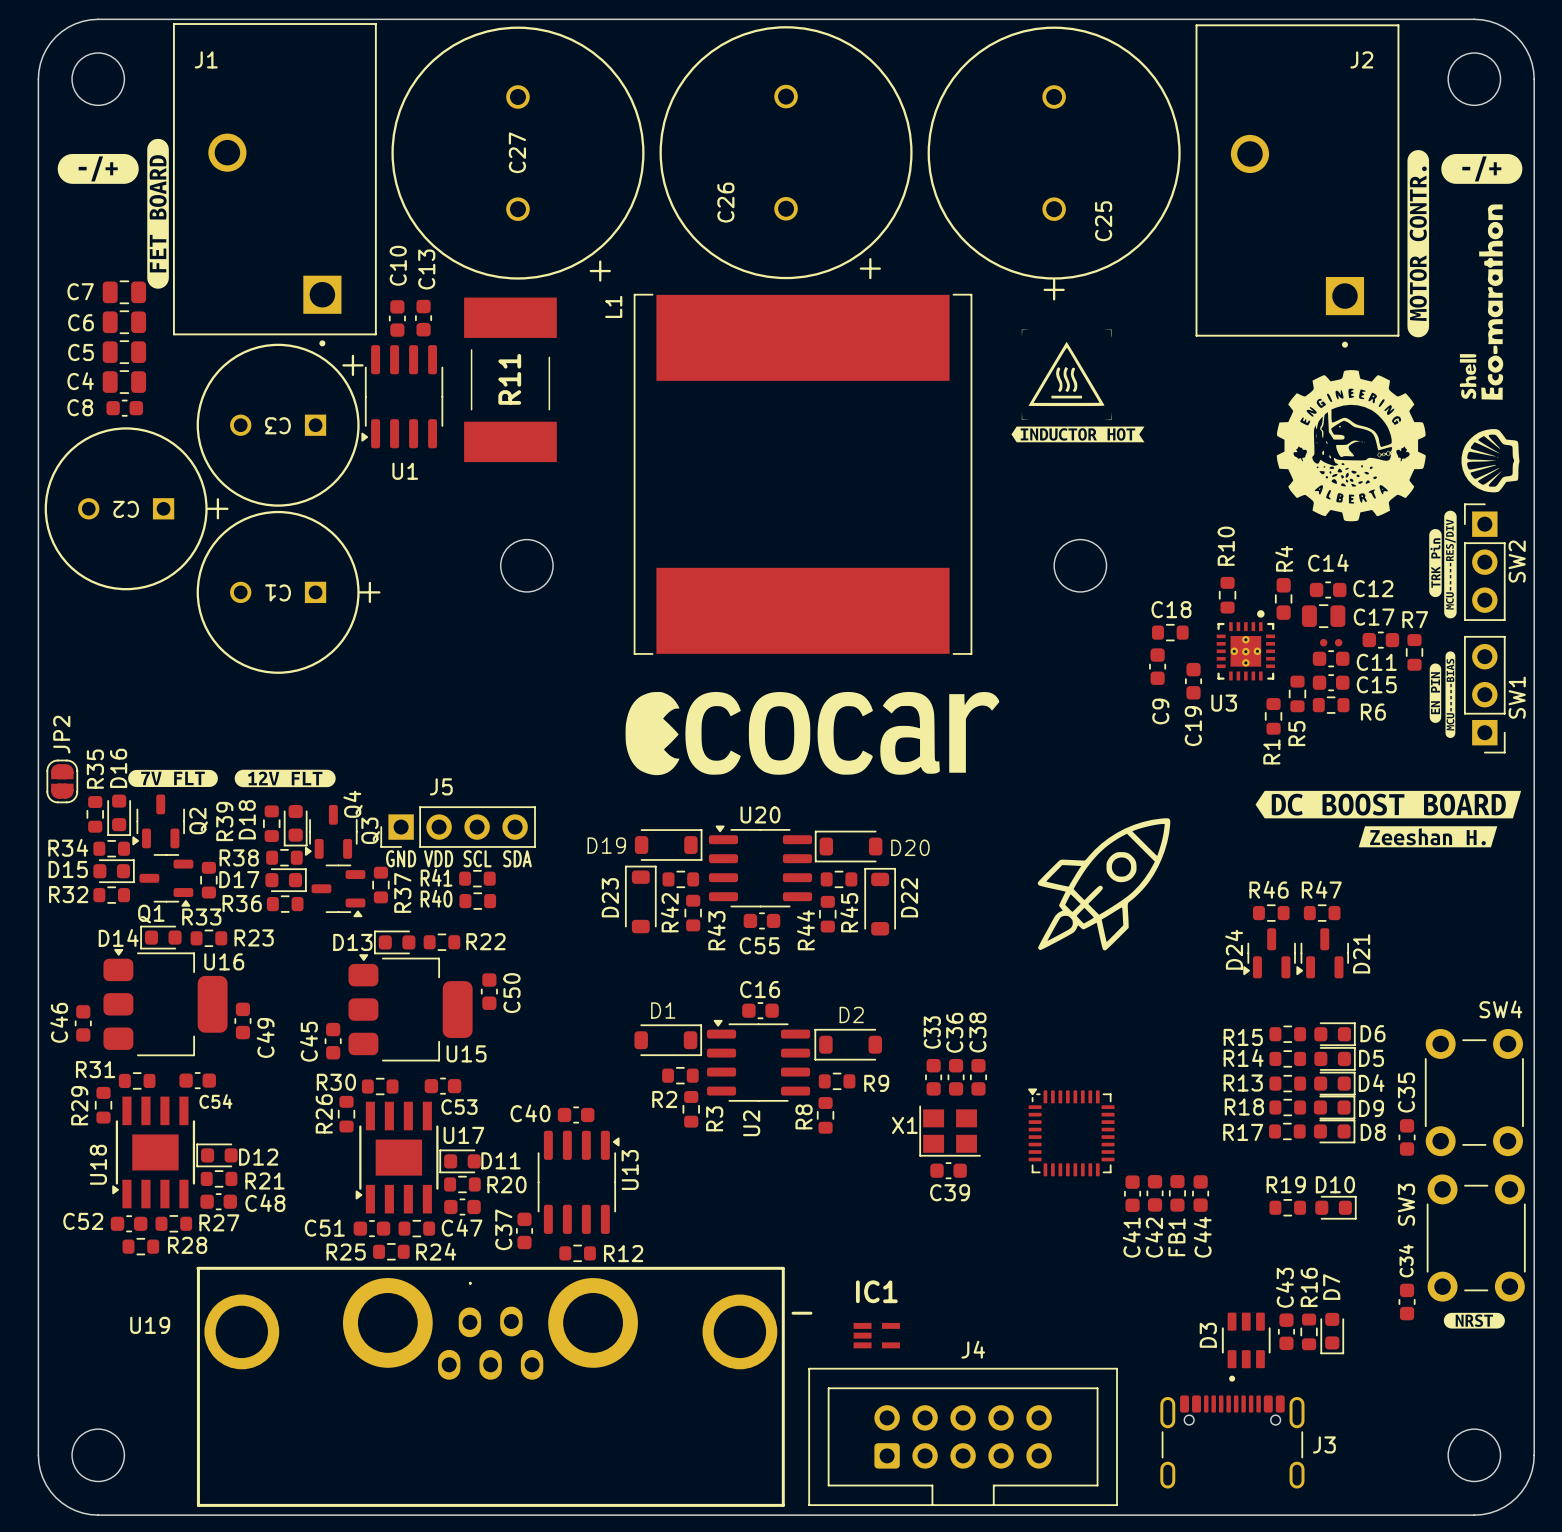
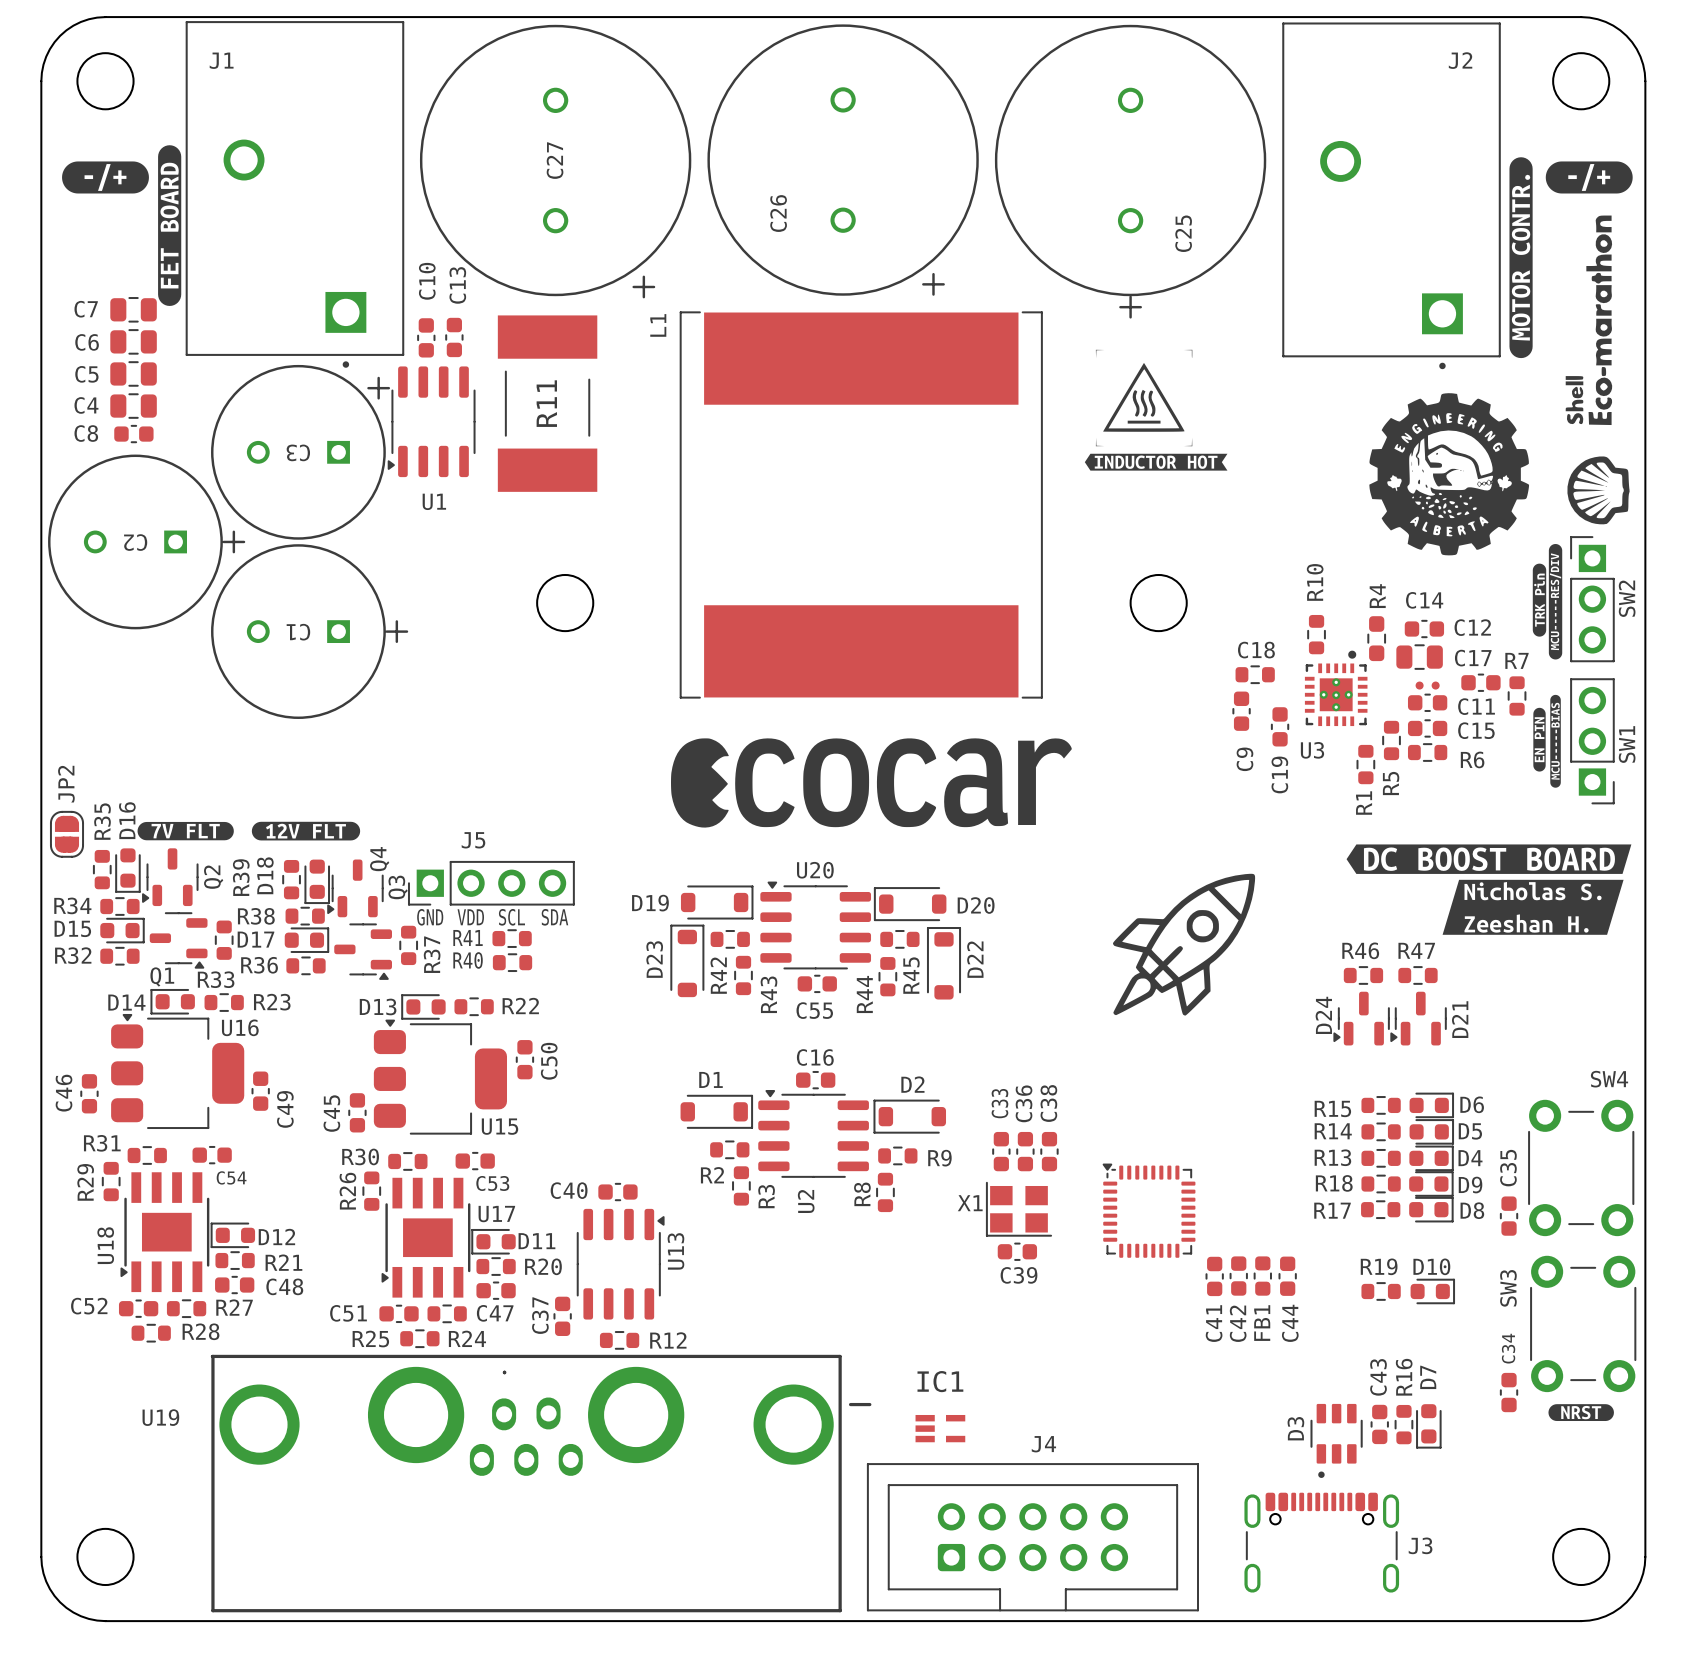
drawing shape: [1358, 826, 1498, 848] -> [1442, 879, 1624, 935]

